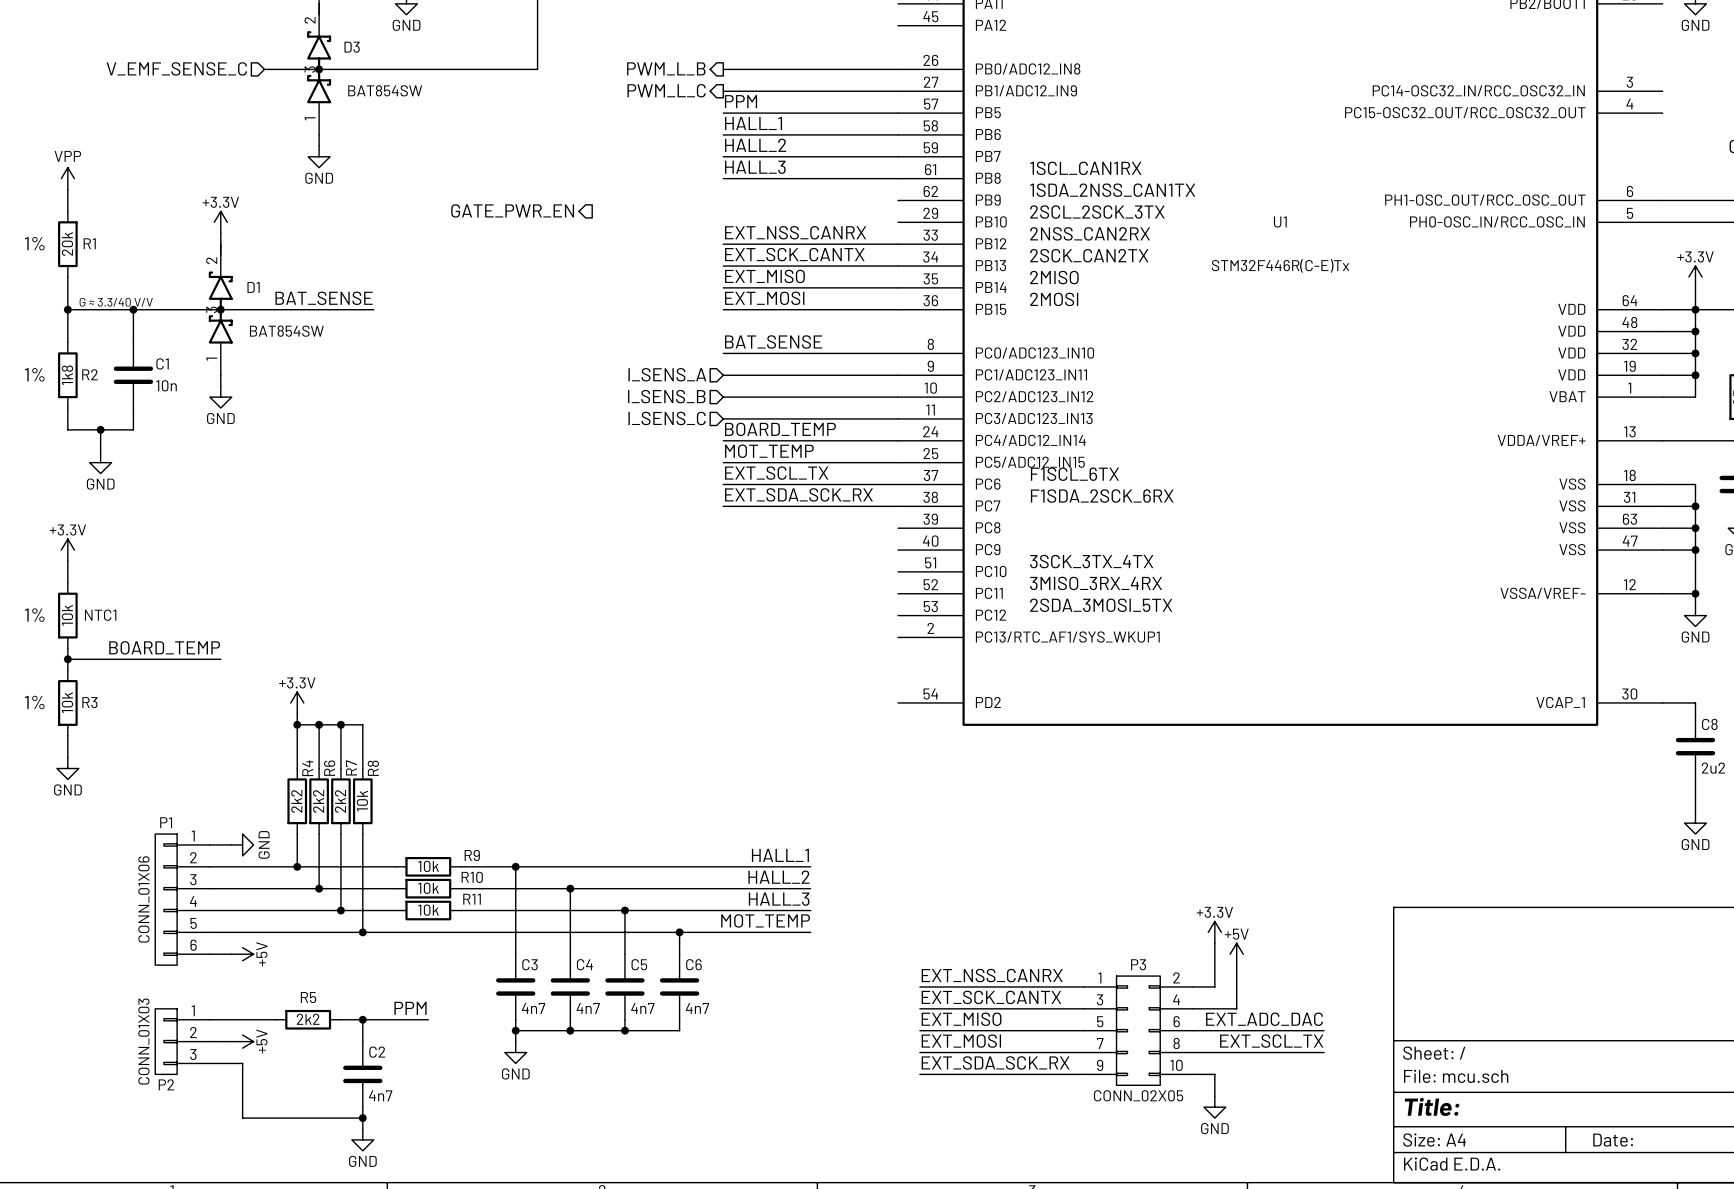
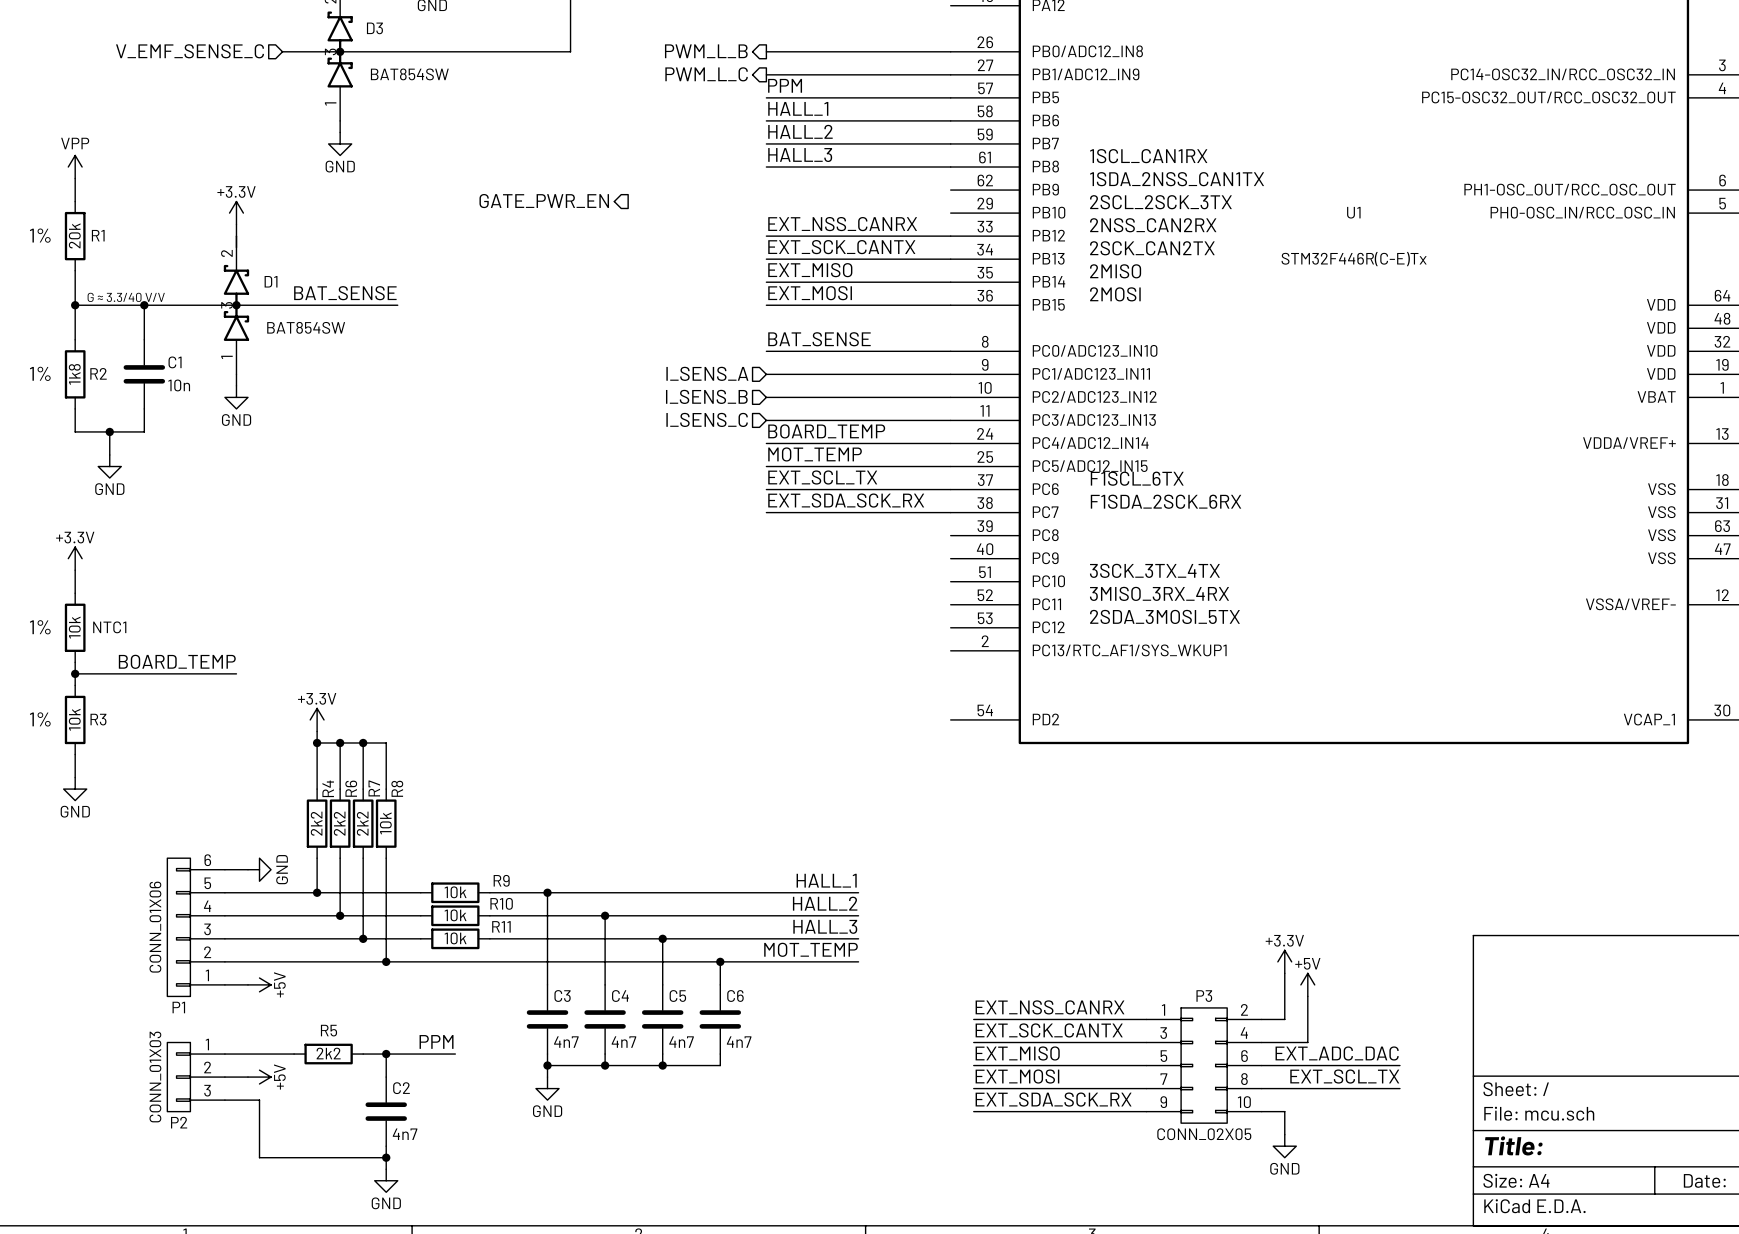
P1 flip: as is (166, 899) -> up-down (178, 927)

